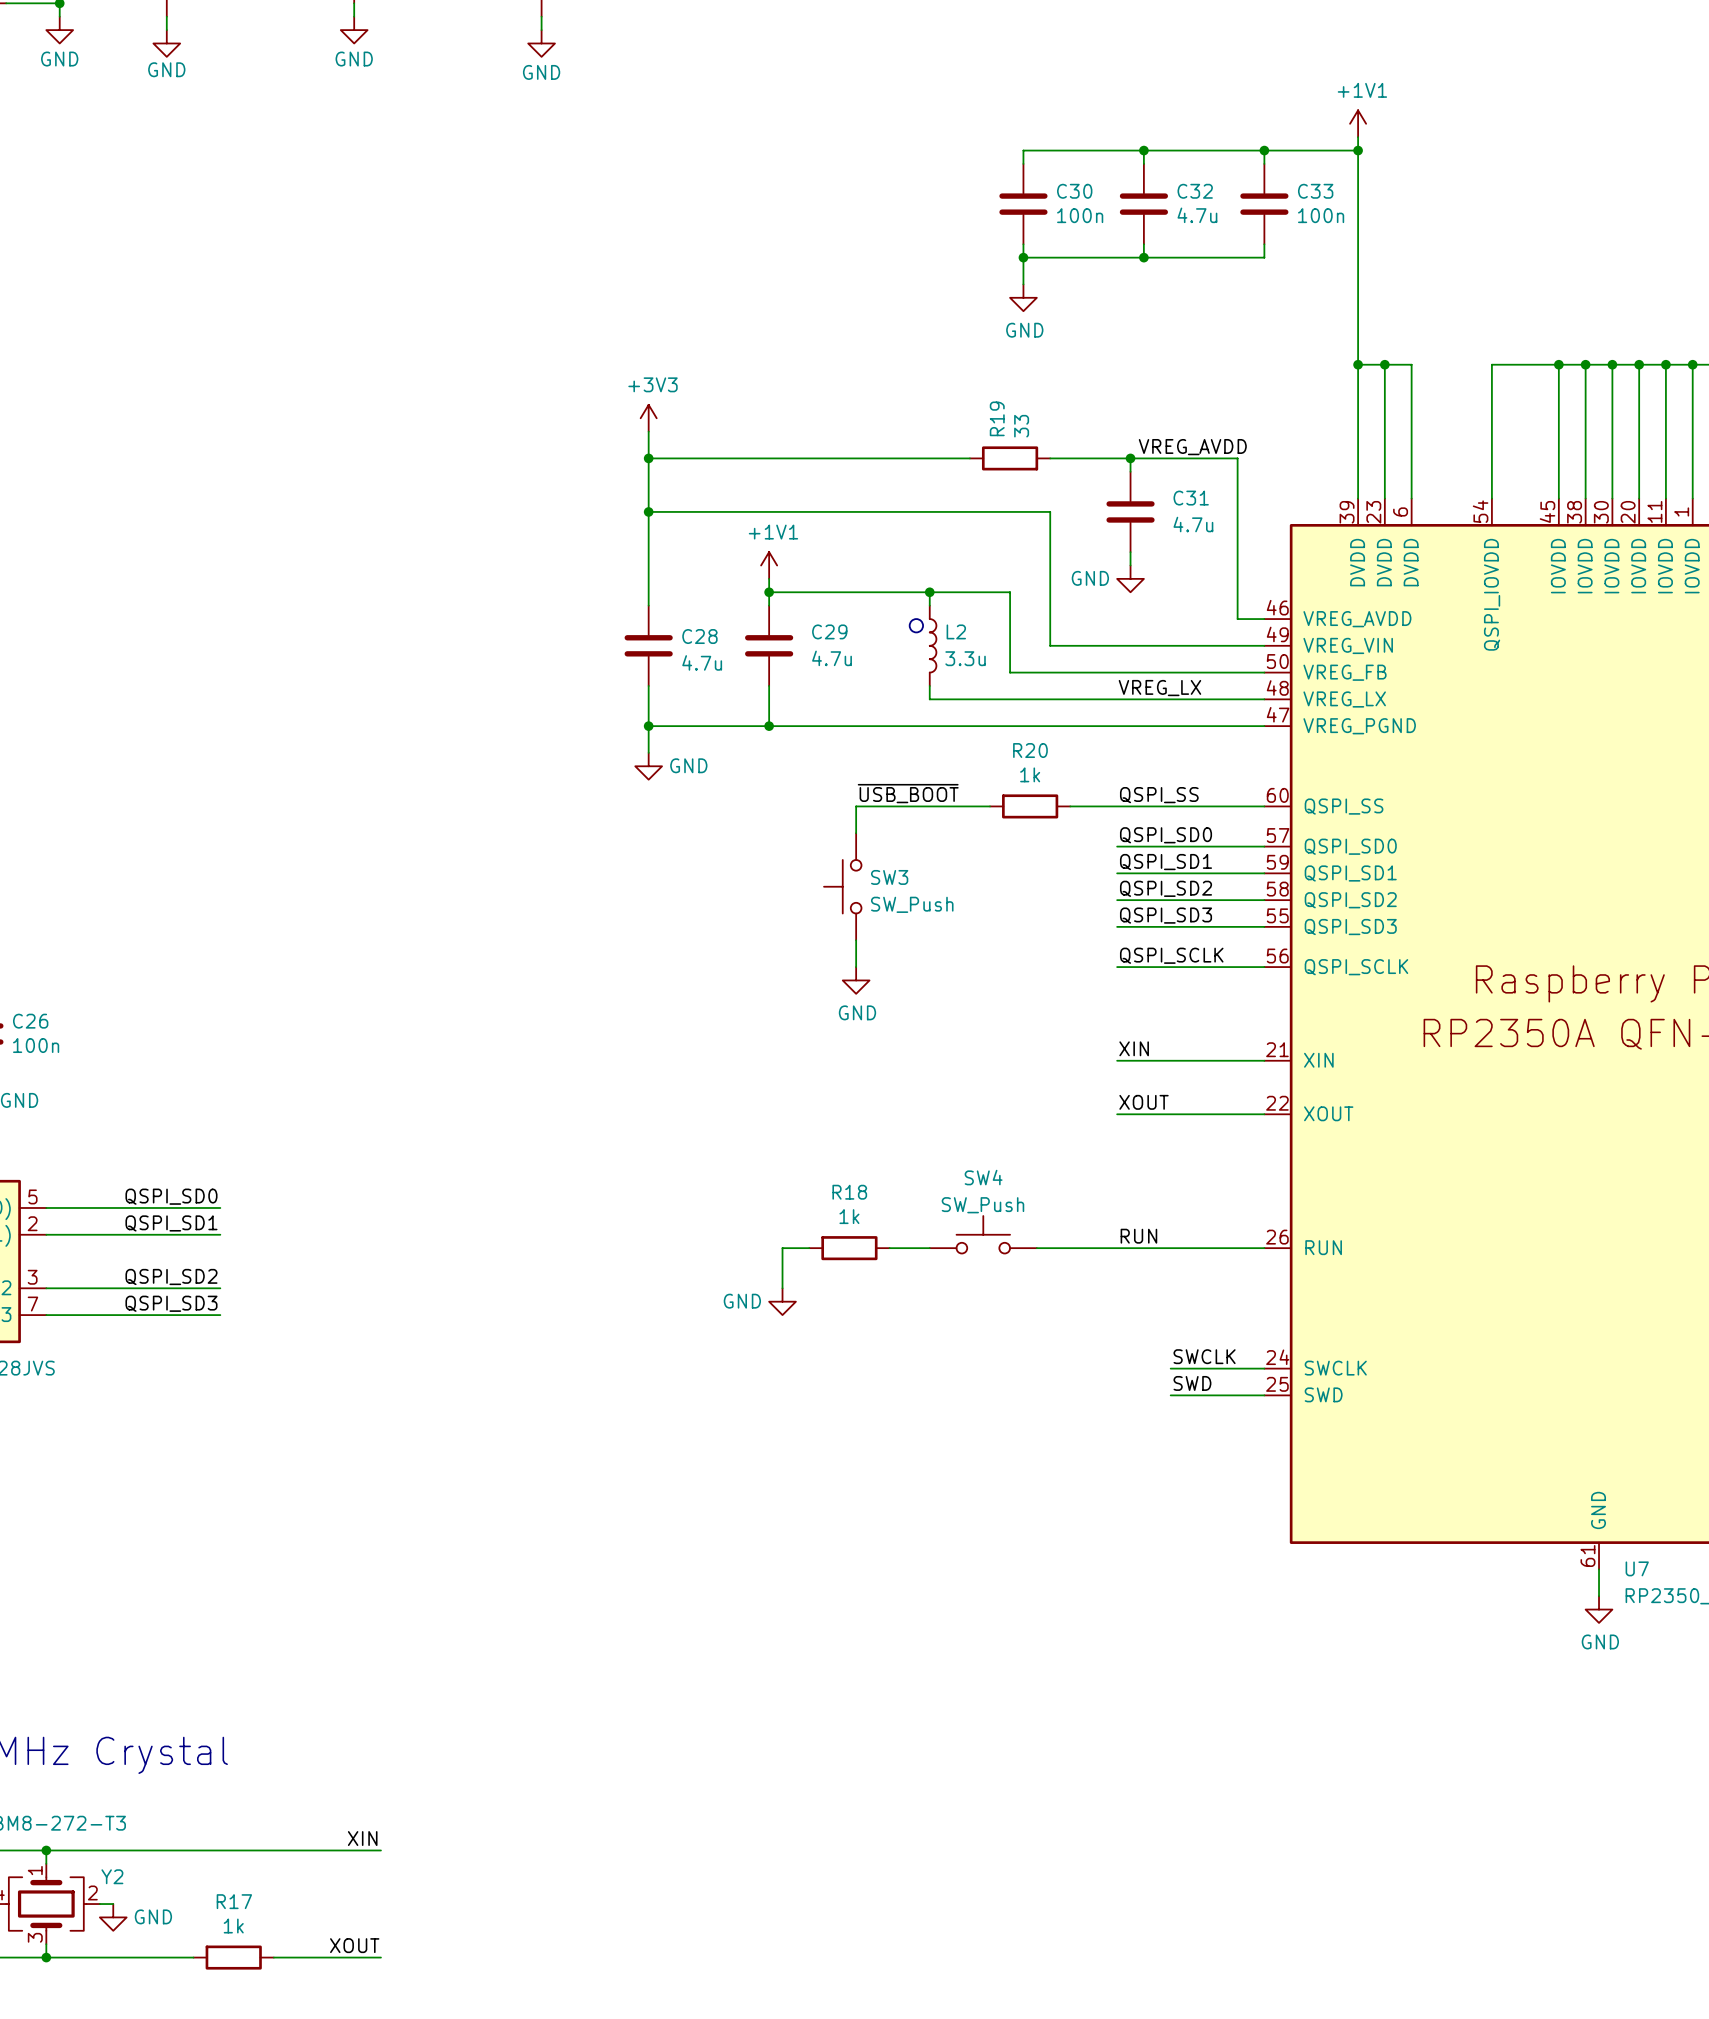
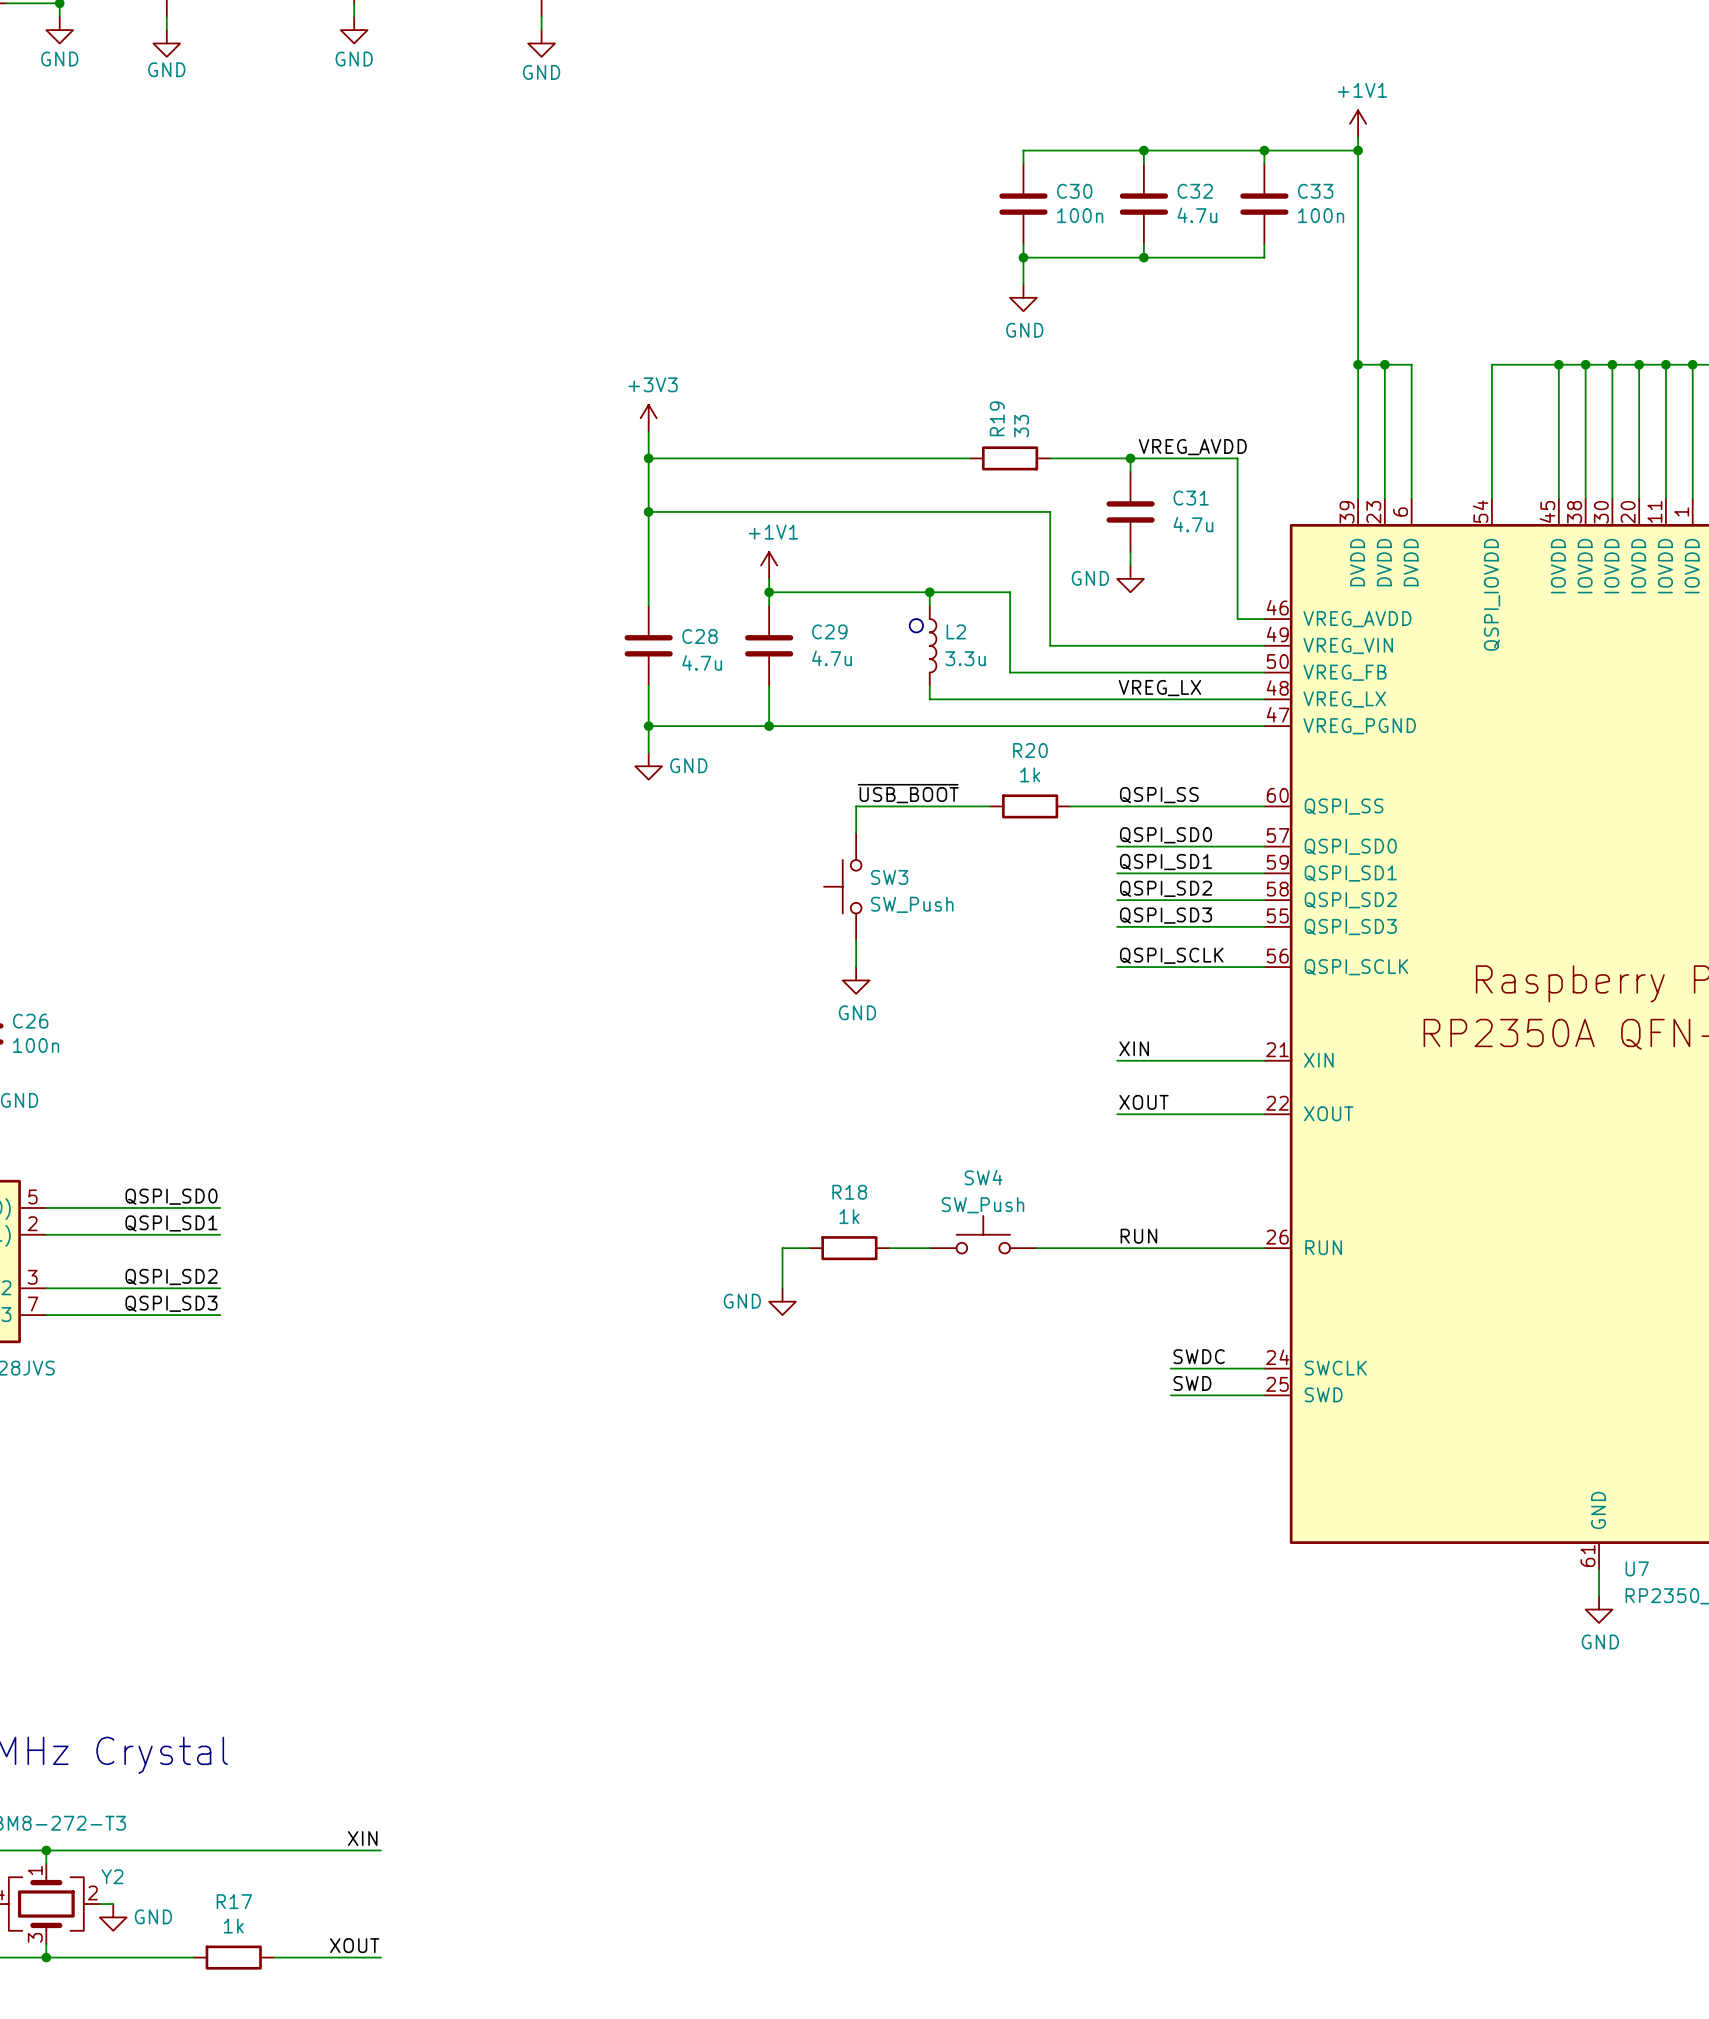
label: SWCLK (1204, 1356) -> SWDC (1199, 1356)

